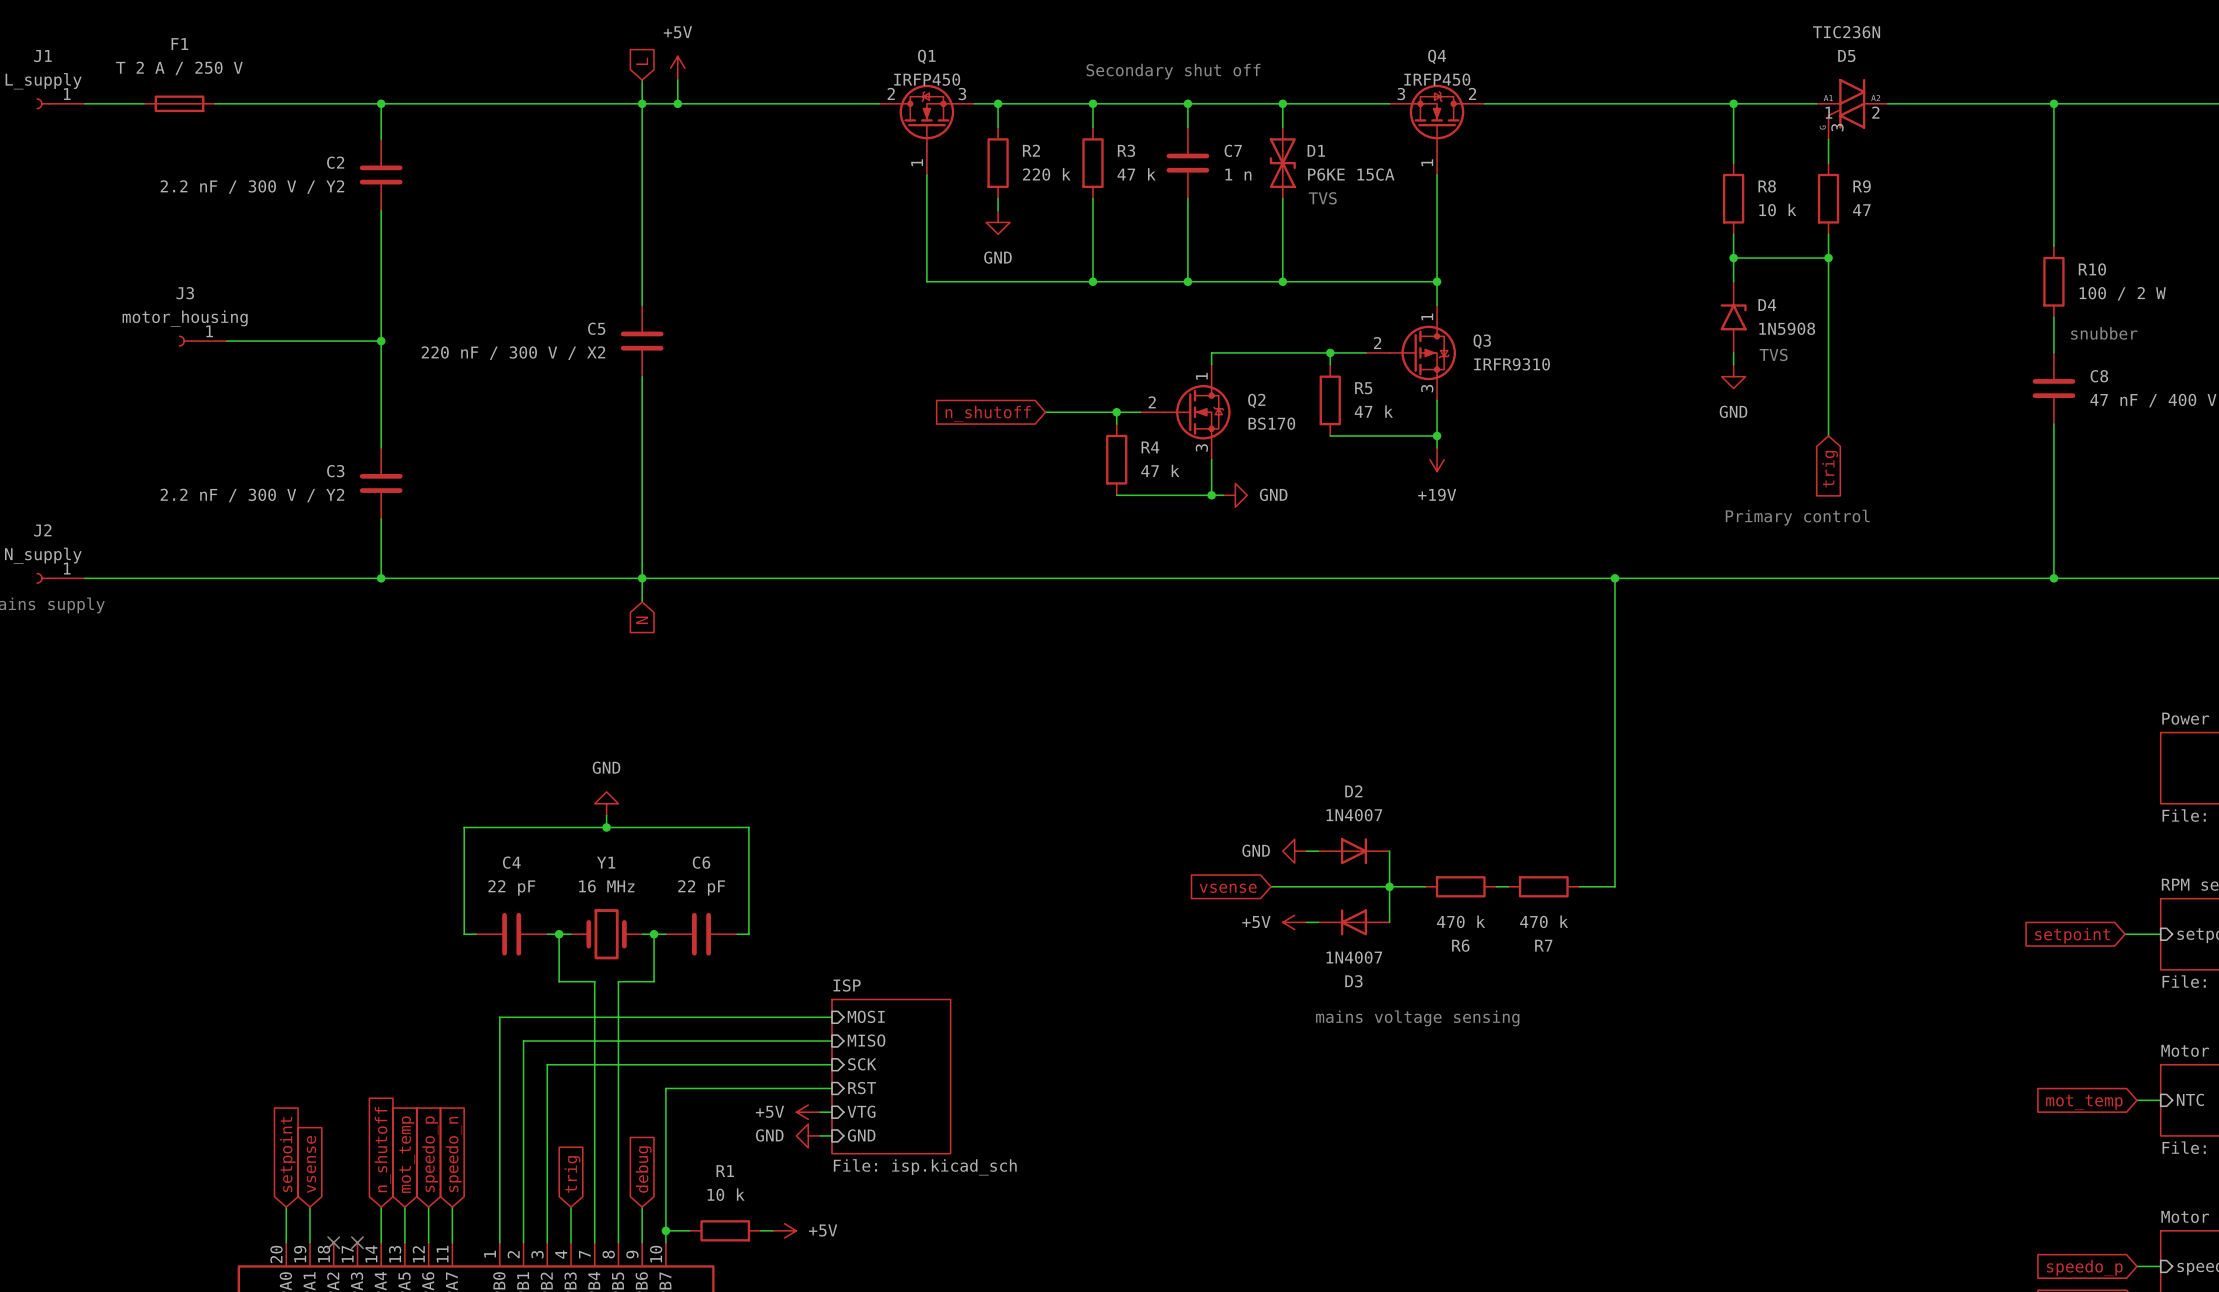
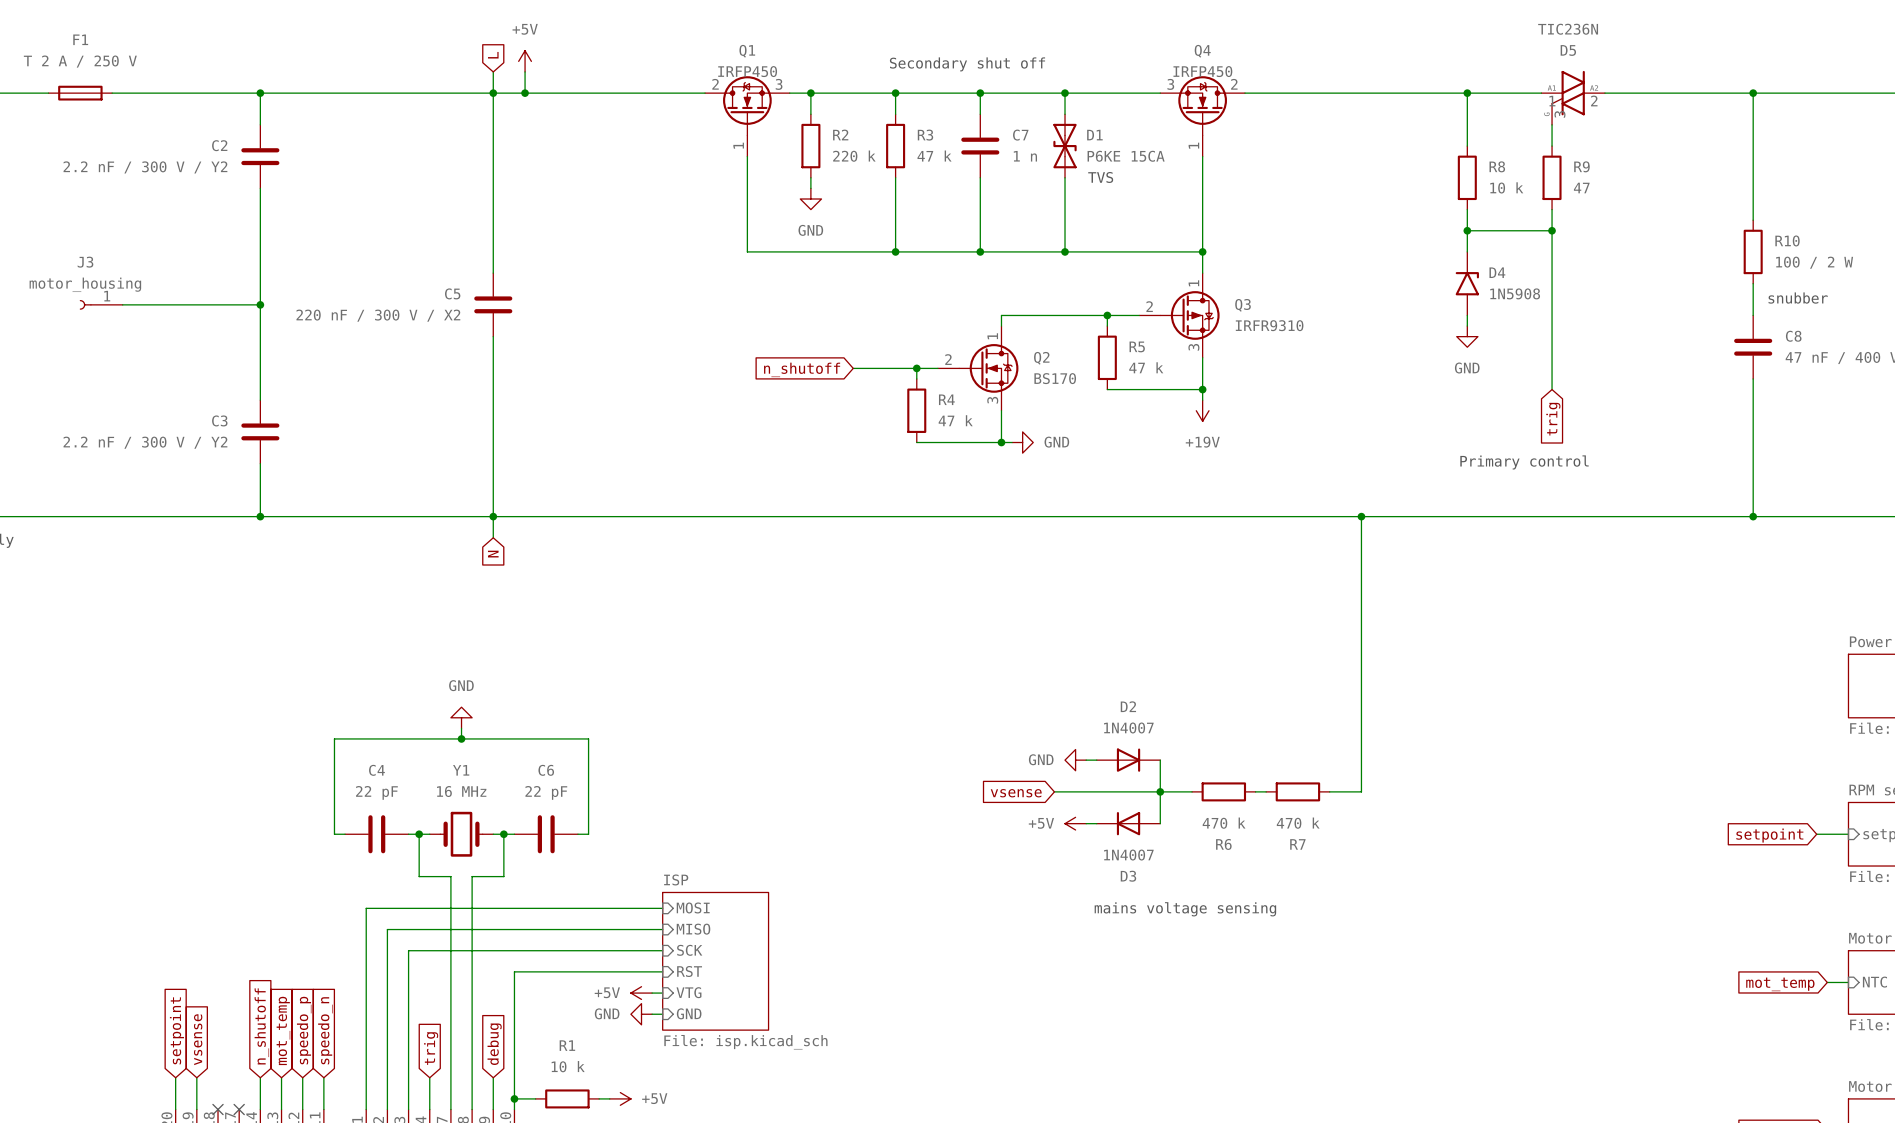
text: TVS (1773, 354) -> none

